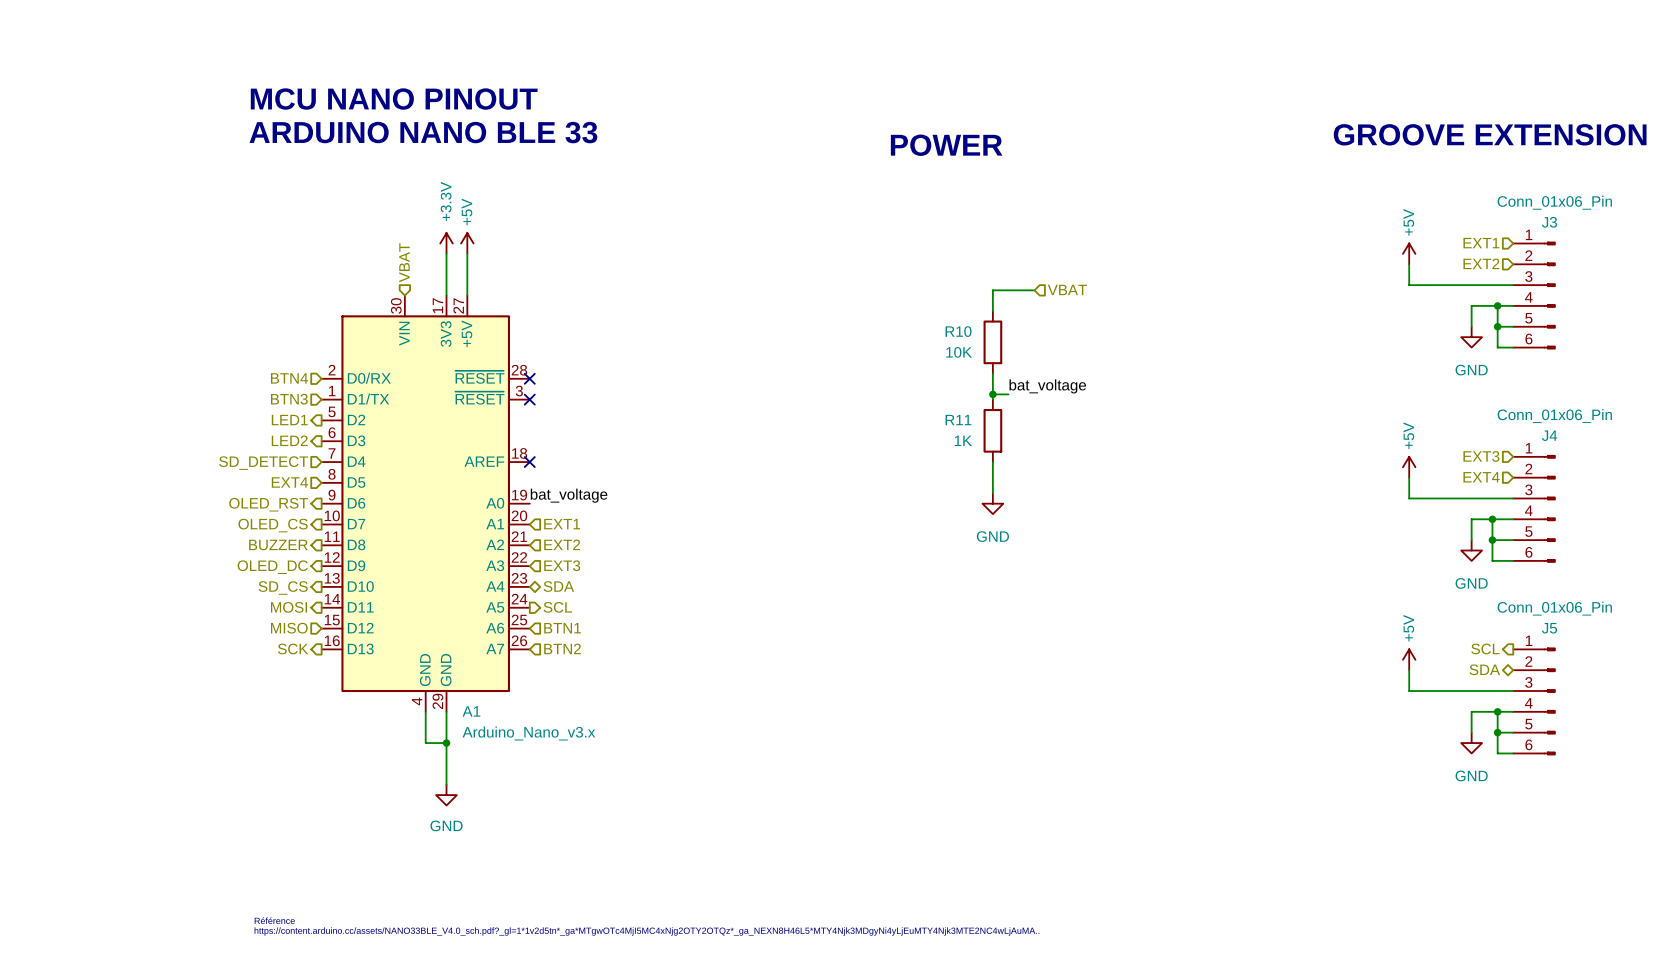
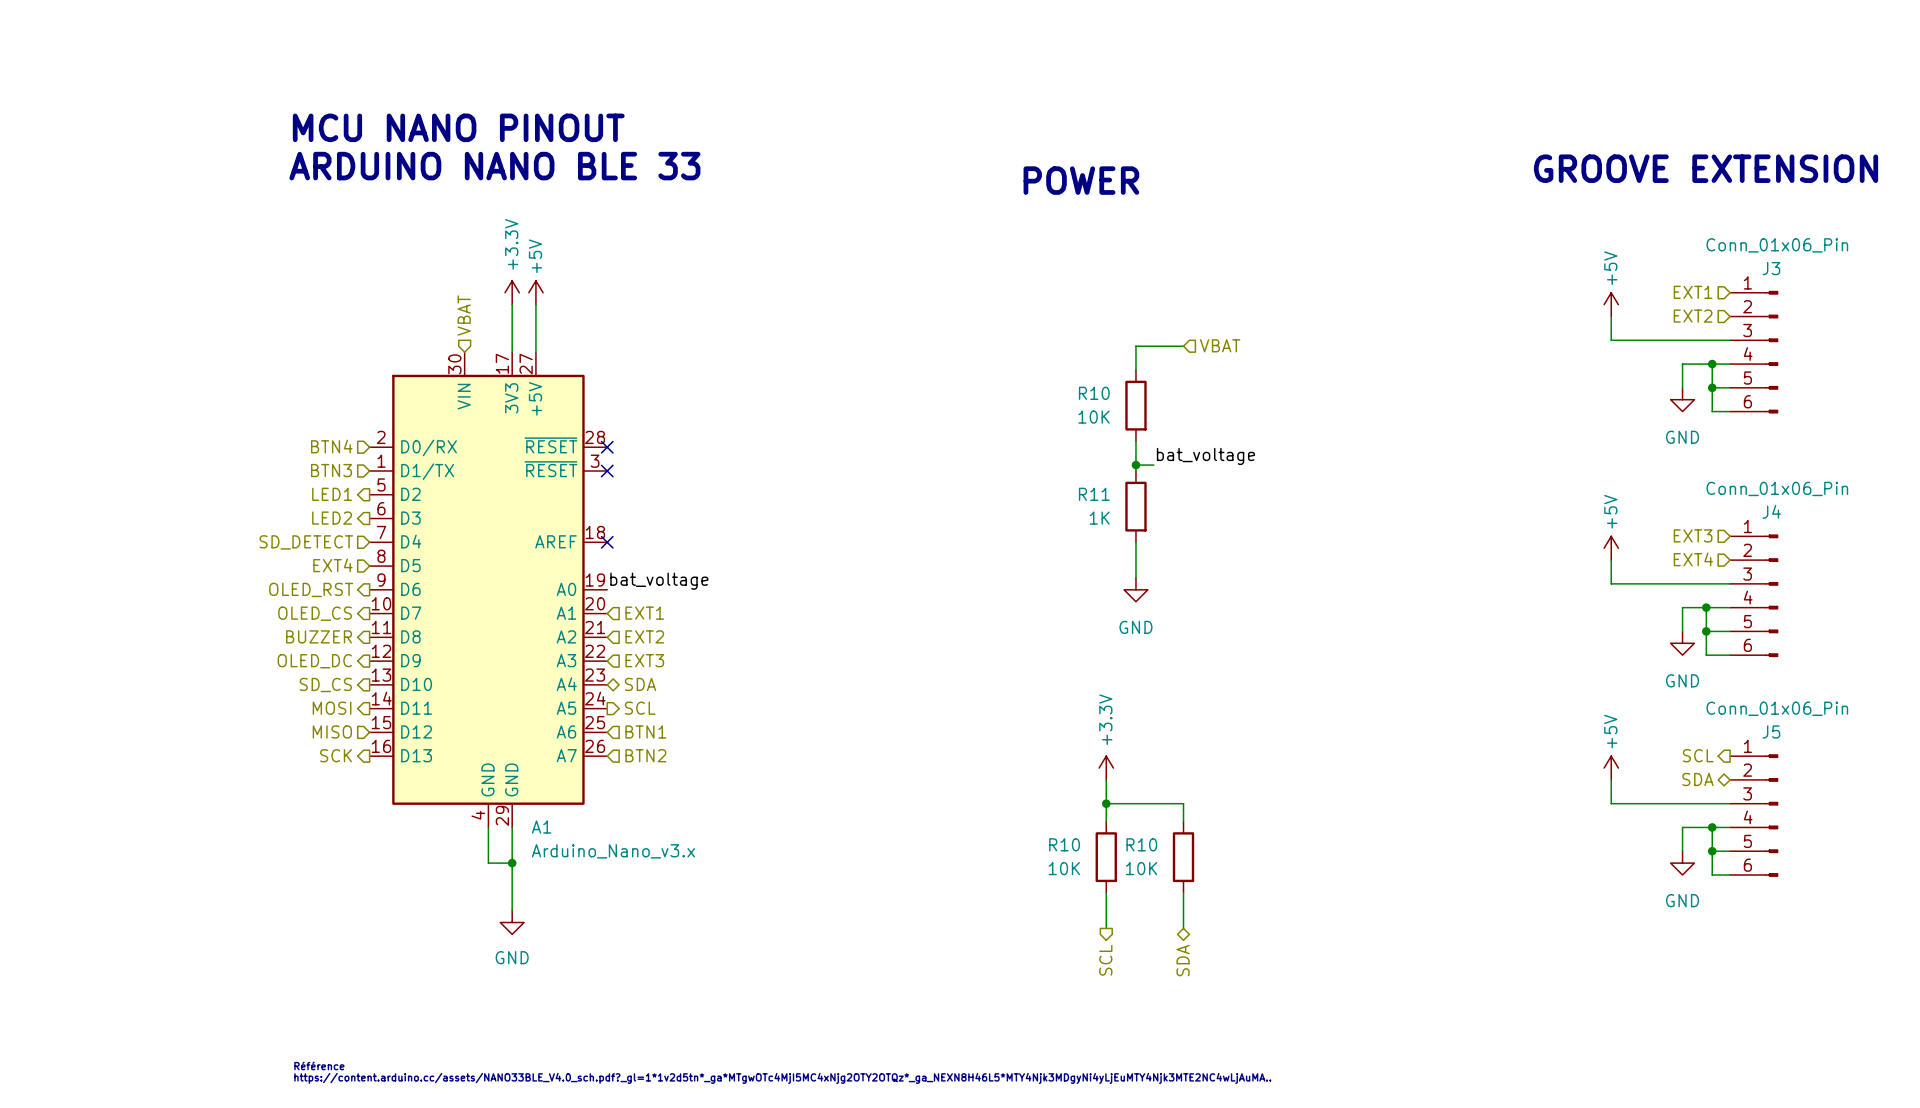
power symbol: none -> +3.3V (1106, 768)
wire: none -> (1106, 779) (1106, 821)
wire: none -> (1106, 803) (1183, 803) (1183, 821)
junction: none -> (1106, 803)
R10: none -> 10K (1106, 857)
R10: none -> 10K (1183, 857)
wire: none -> (1106, 892) (1106, 928)
wire: none -> (1183, 892) (1183, 928)
hierarchical label: none -> SCL (1105, 960)
hierarchical label: none -> SDA (1183, 960)

